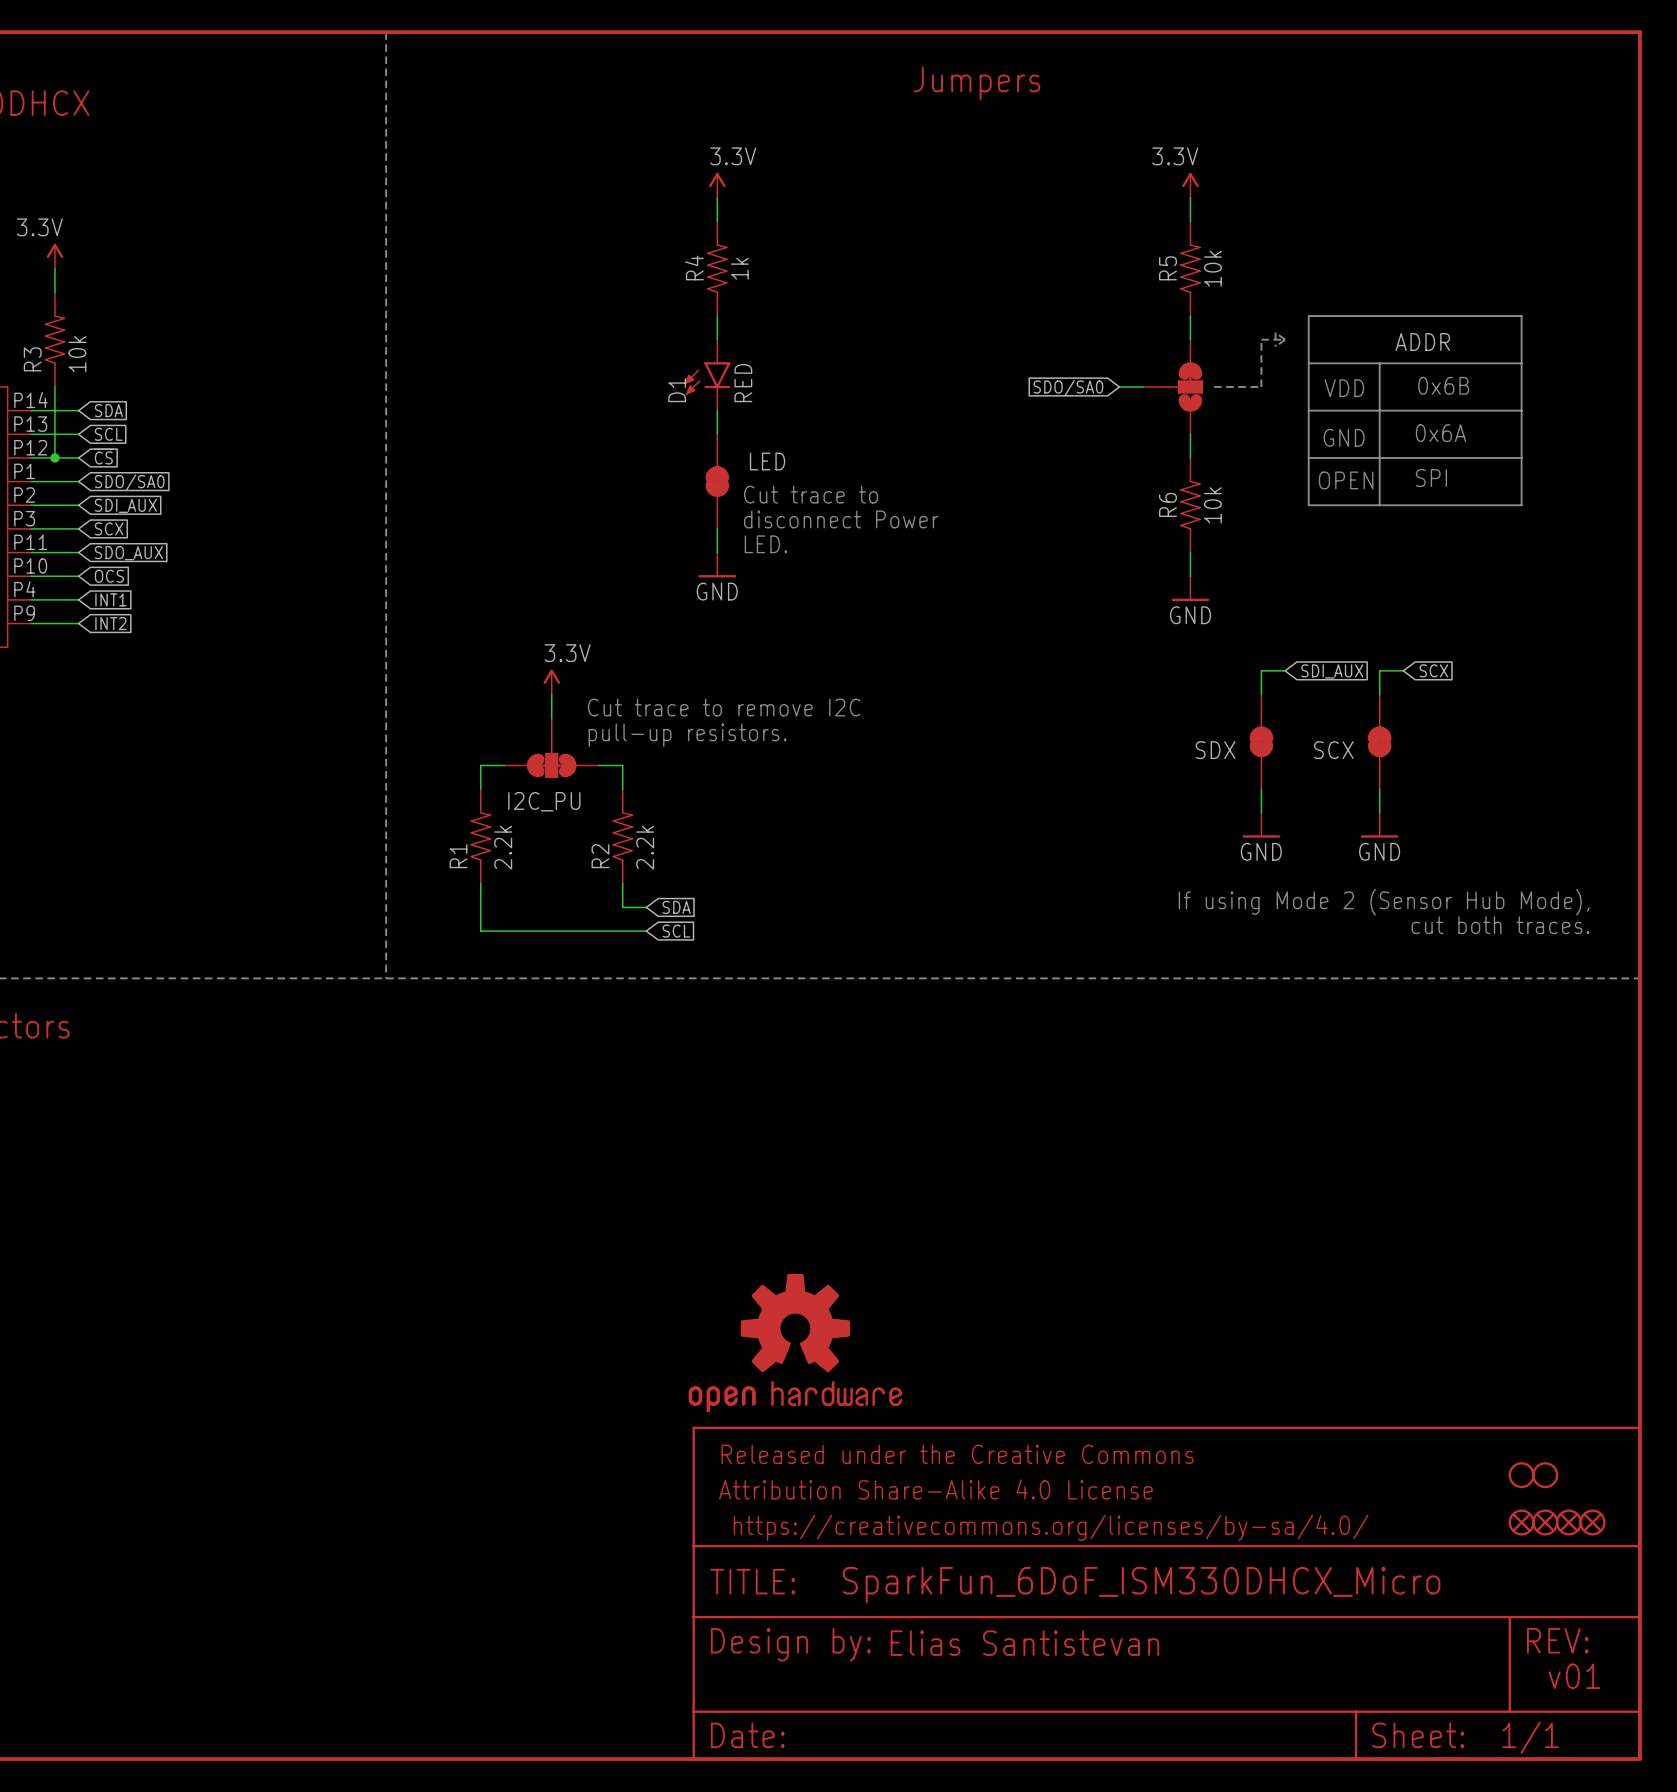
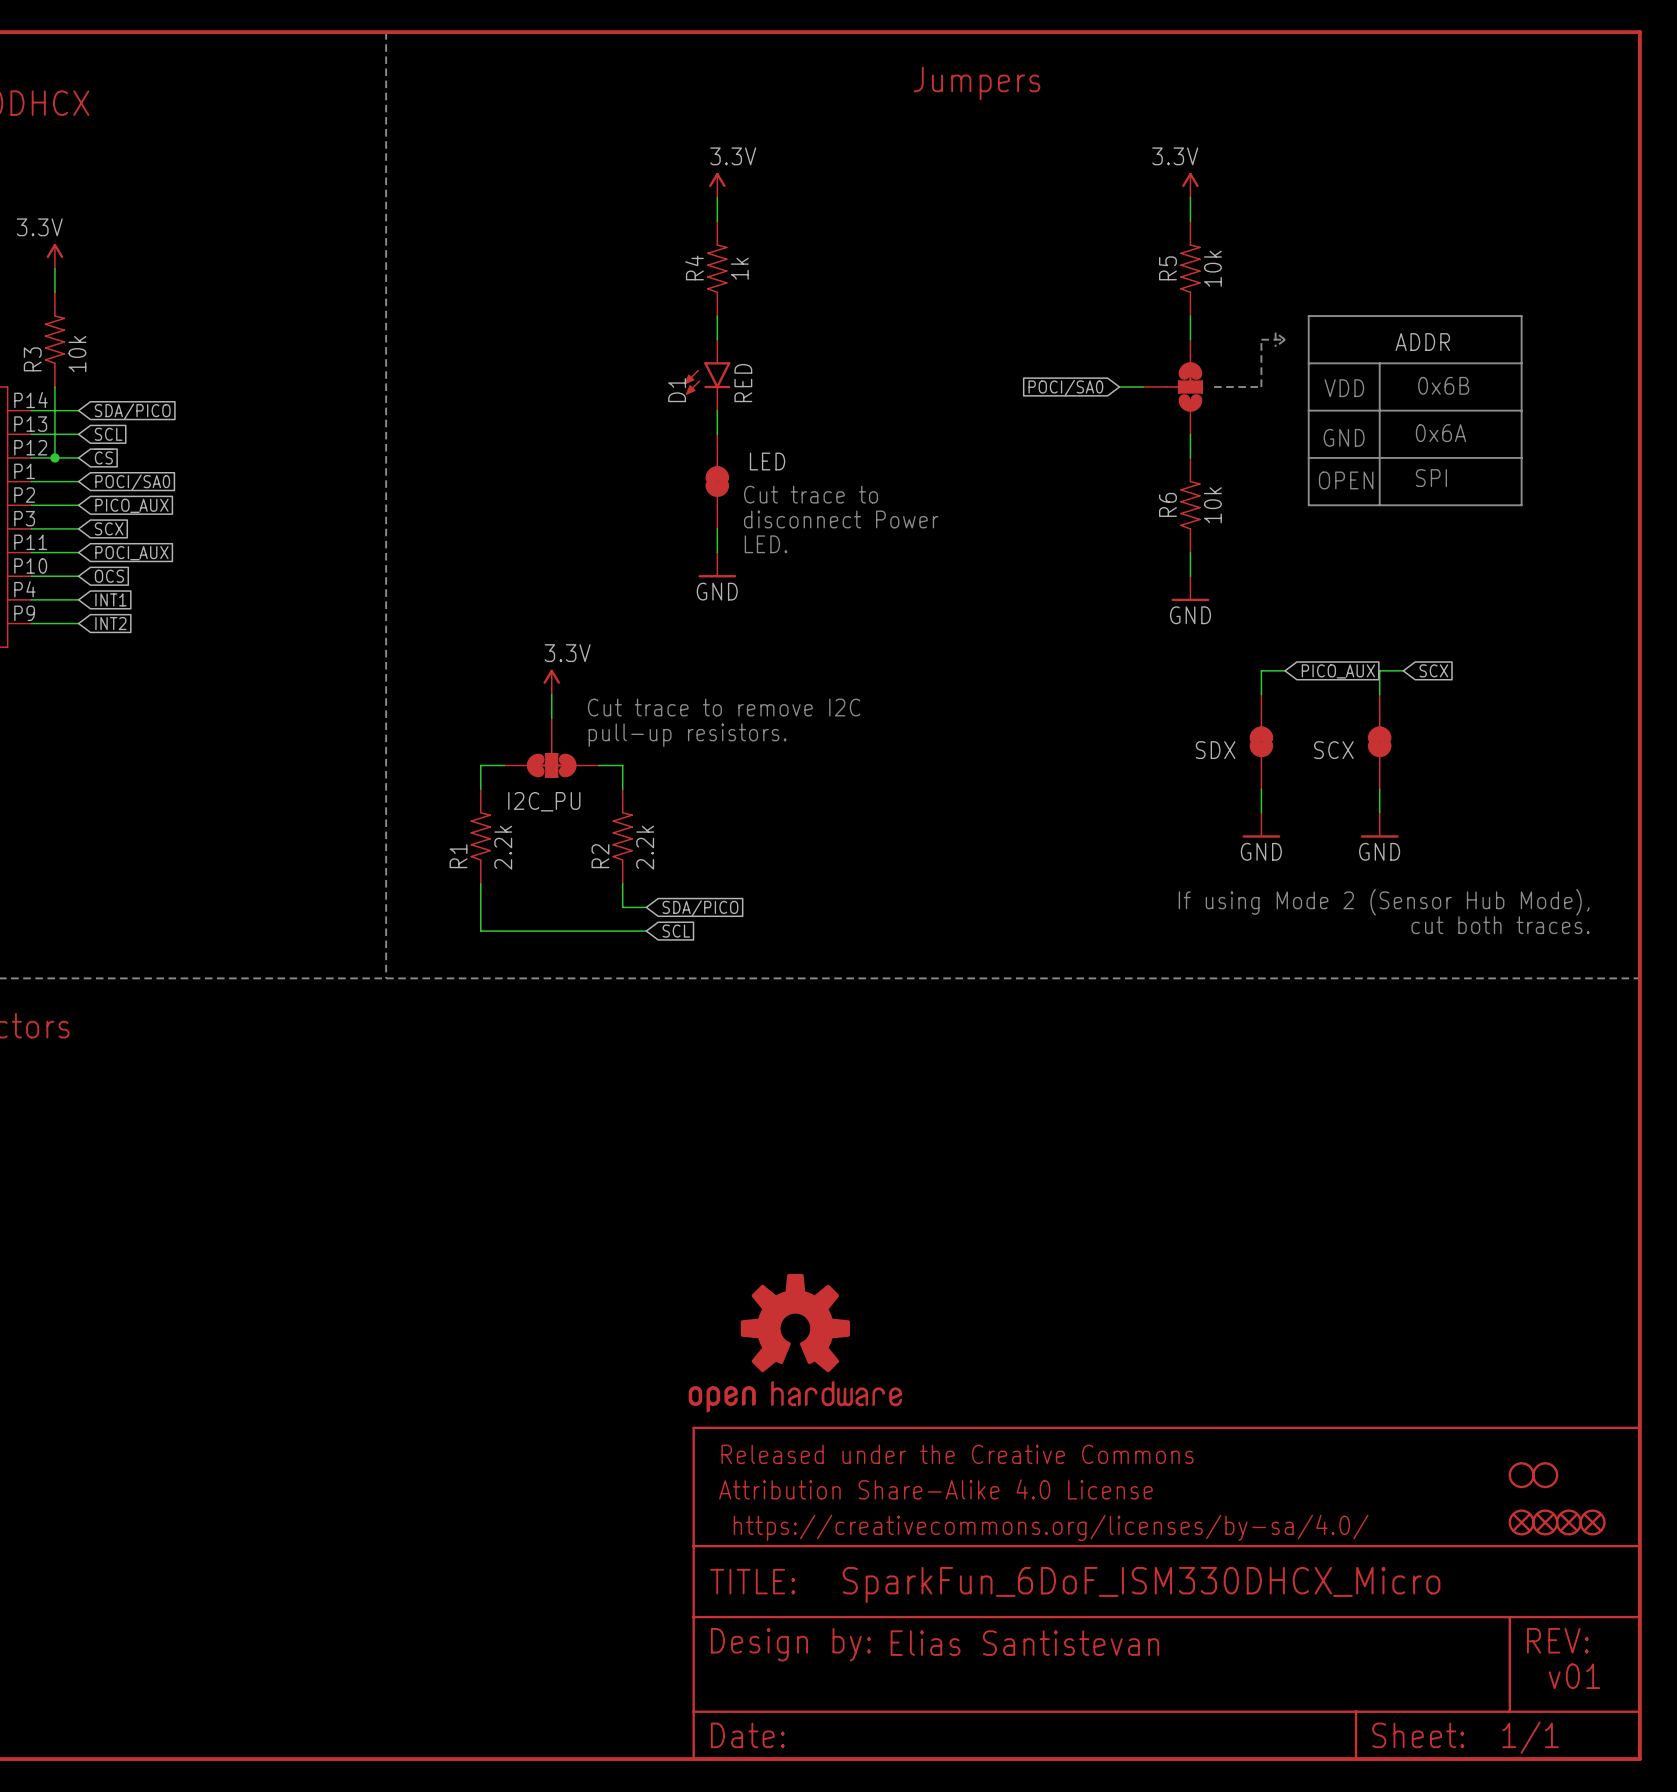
global label: SDO/SA0 (1068, 388) -> POCI/SA0 (1065, 388)
global label: SDA (108, 410) -> SDA/PICO (132, 411)
global label: SDO/SA0 (129, 482) -> POCI/SA0 (132, 482)
global label: SDI_AUX (125, 505) -> PICO_AUX (131, 505)
global label: SDO_AUX (128, 553) -> POCI_AUX (131, 553)
global label: SDI_AUX (1332, 671) -> PICO_AUX (1338, 671)
global label: SDA (676, 907) -> SDA/PICO (700, 908)

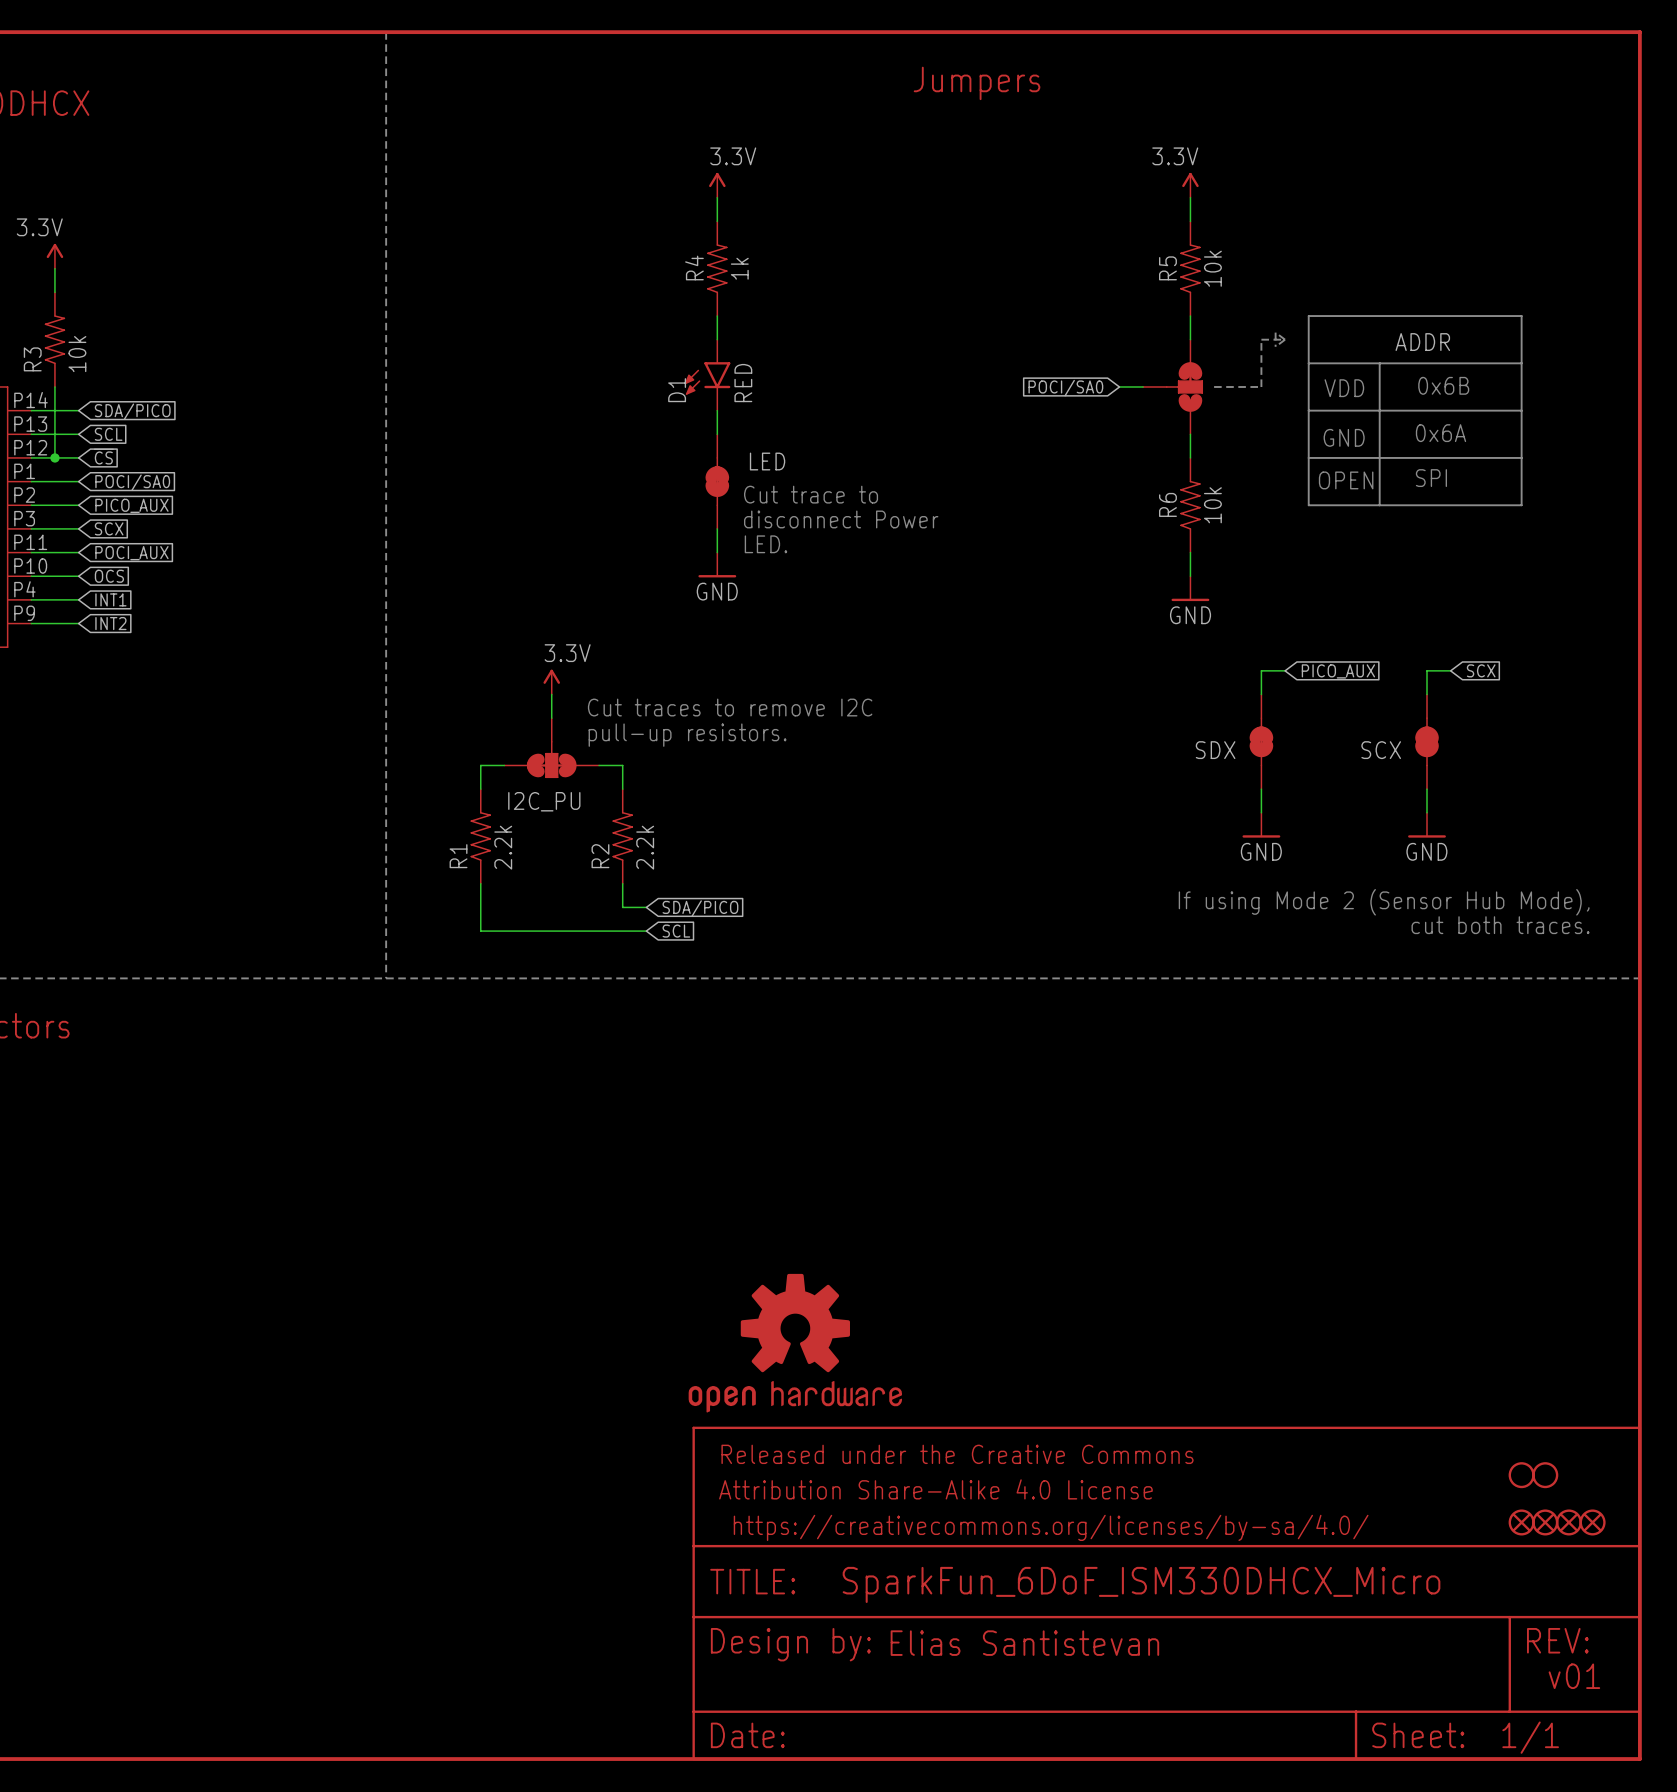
wire: (1403, 670) (1379, 670) (1379, 694) -> (1450, 670) (1427, 670) (1427, 694)
global label position: SCX (1433, 670) -> SCX (1481, 670)
text: Cut trace to remove I2C (724, 707) -> Cut traces to remove I2C (730, 707)
SCX position: (1379, 741) -> (1427, 741)
wire: (1379, 789) (1379, 812) -> (1427, 789) (1427, 812)
power symbol position: GND (1379, 825) -> GND (1427, 825)

